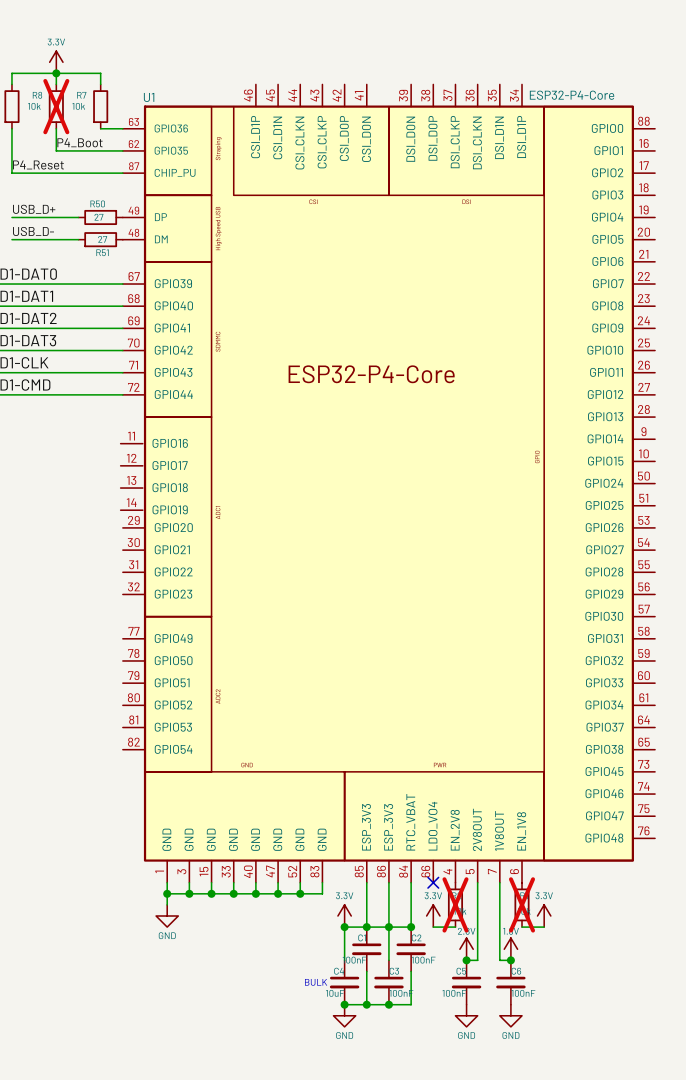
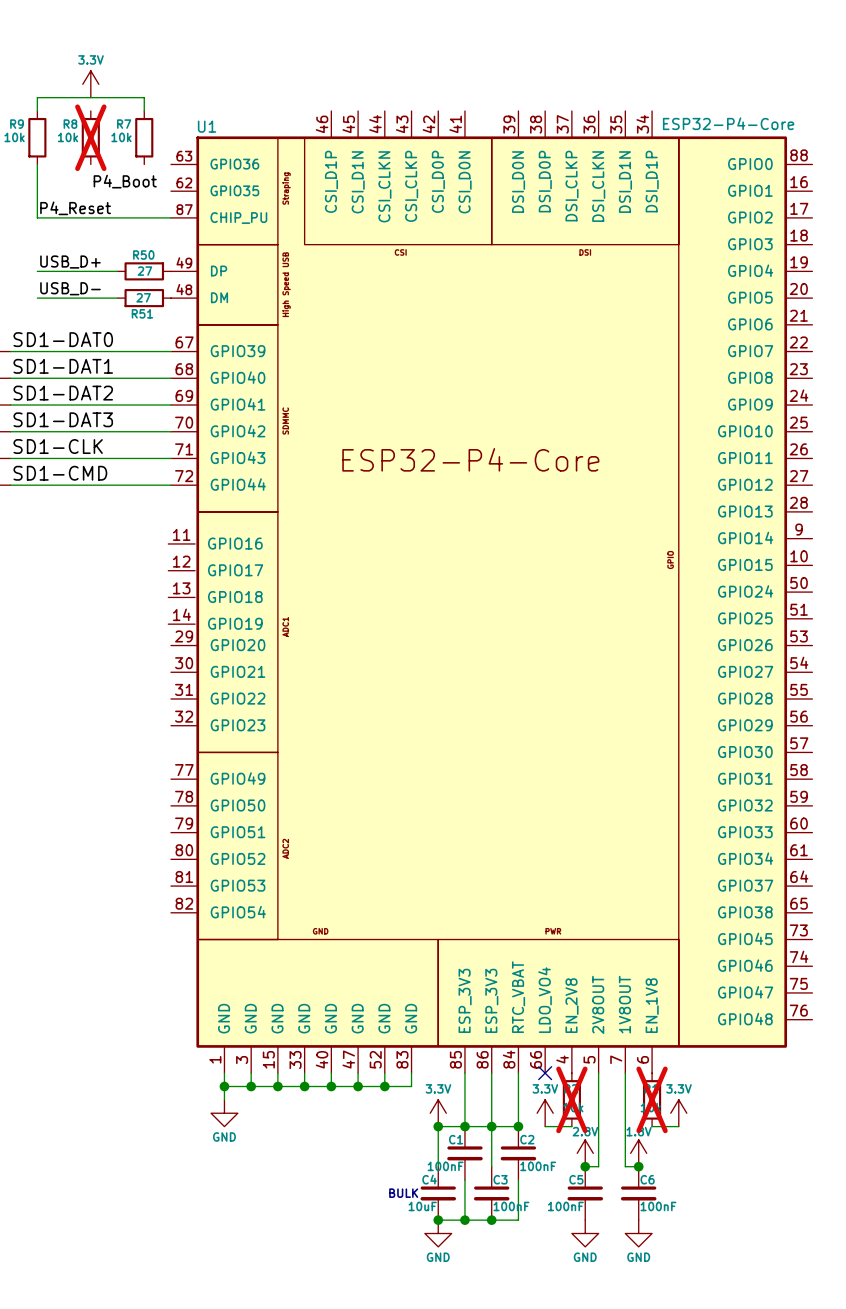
wire: (56, 73) (56, 84) -> none
junction: (56, 73) -> none
wire: (56, 128) (56, 150) (122, 150) -> none
wire: (100, 128) (122, 128) -> none

